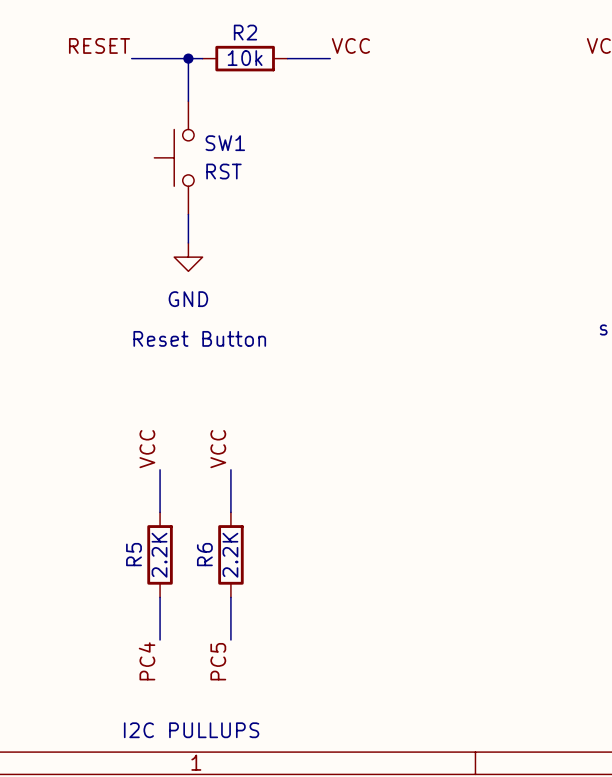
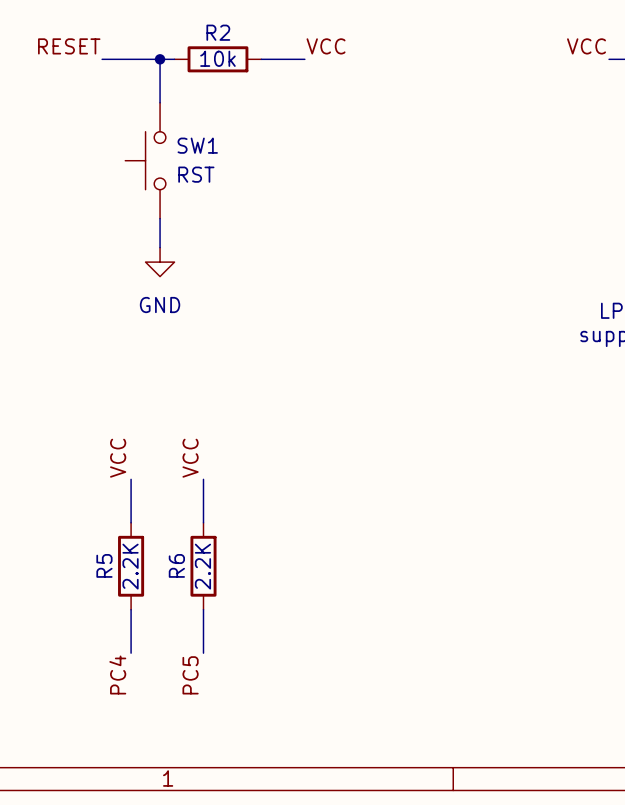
text: Reset Button (199, 338) -> none
text: I2C PULLUPS (191, 730) -> none

